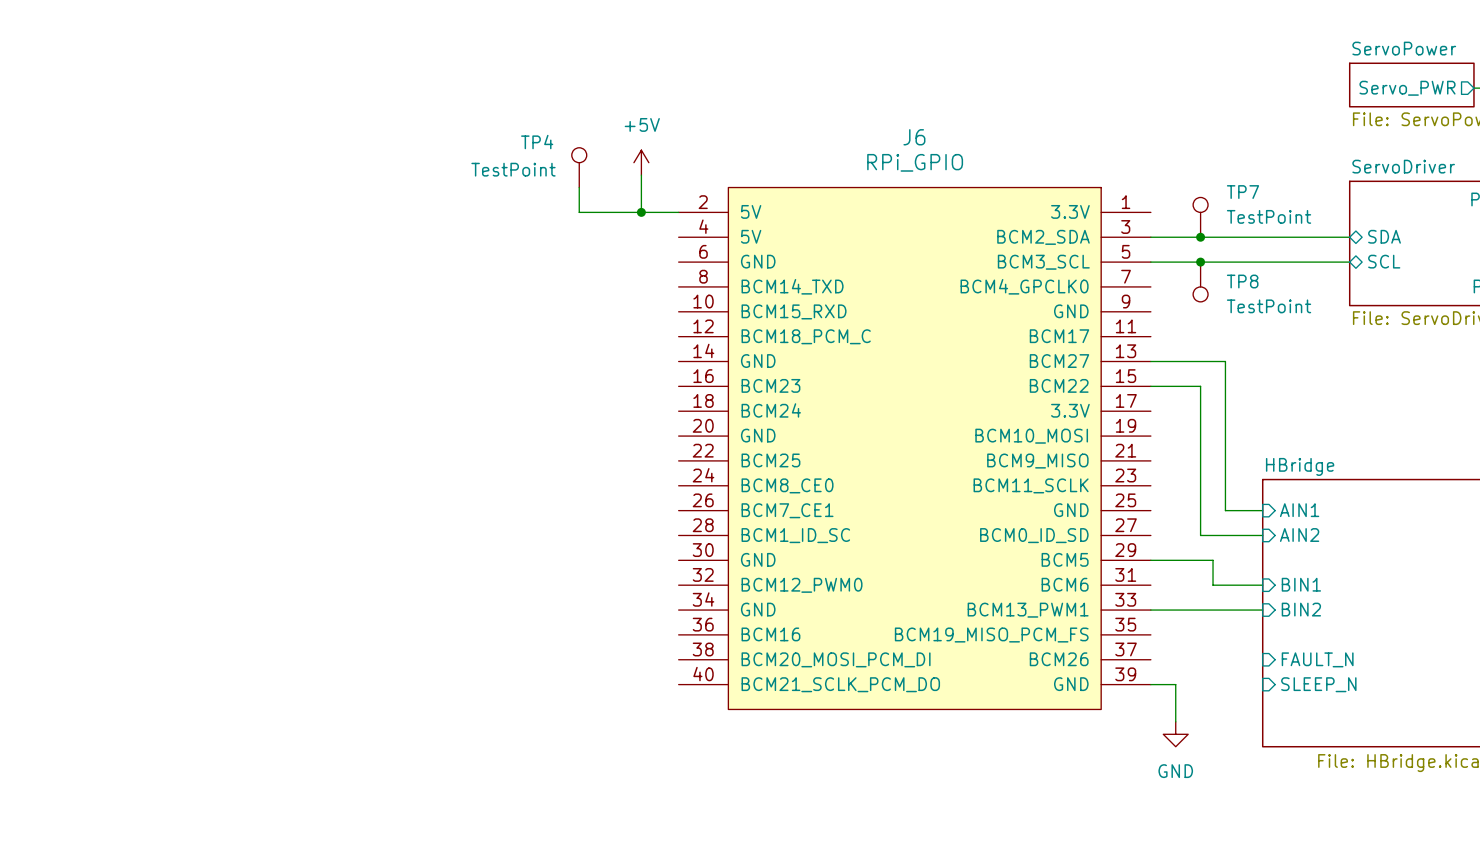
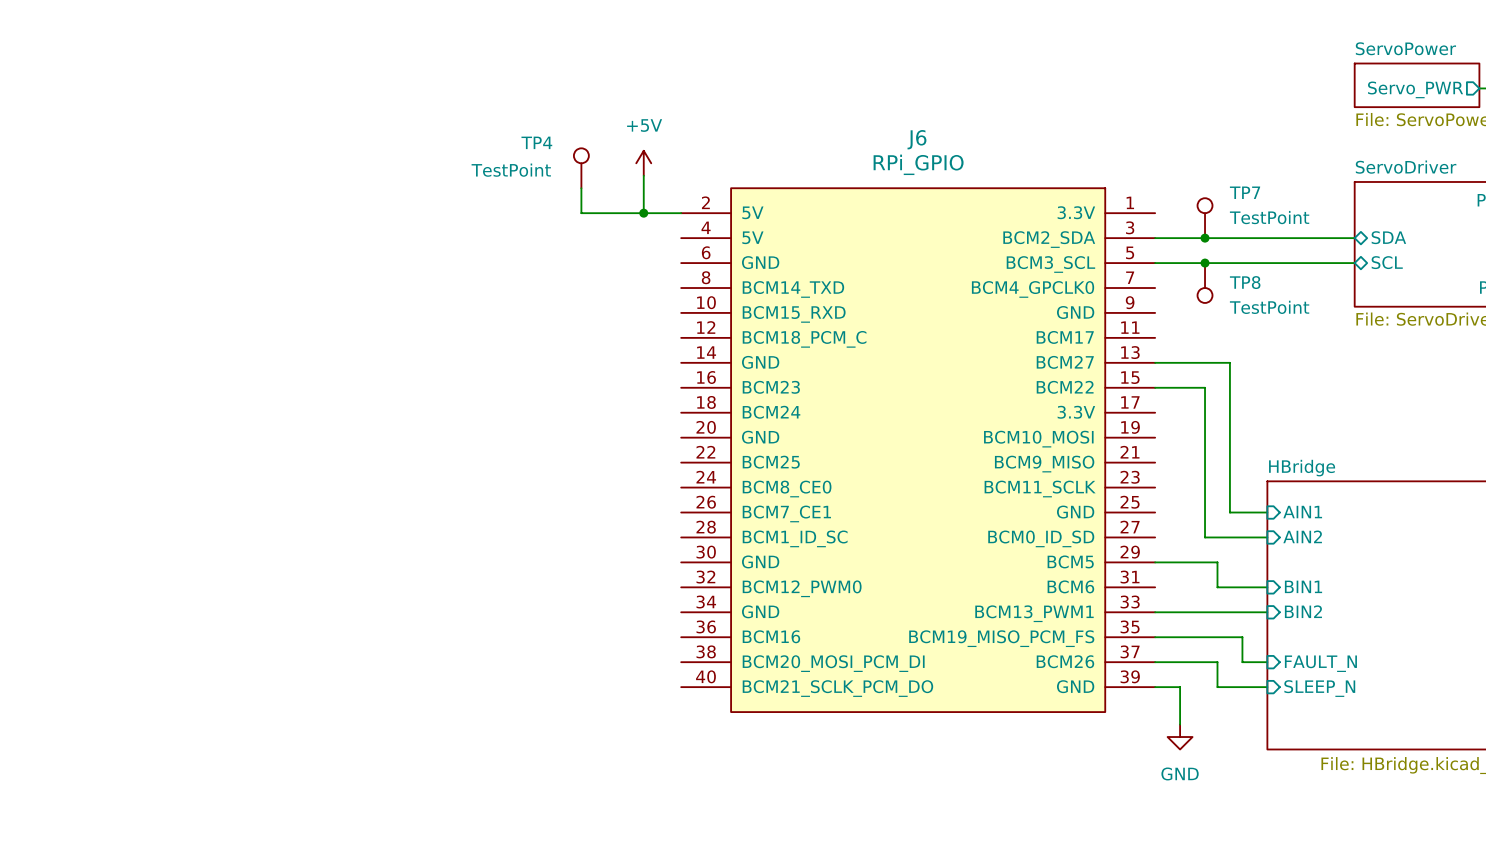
wire: none -> (1155, 637) (1242, 637) (1242, 662) (1267, 662)
wire: none -> (1155, 662) (1217, 662) (1217, 687) (1267, 687)

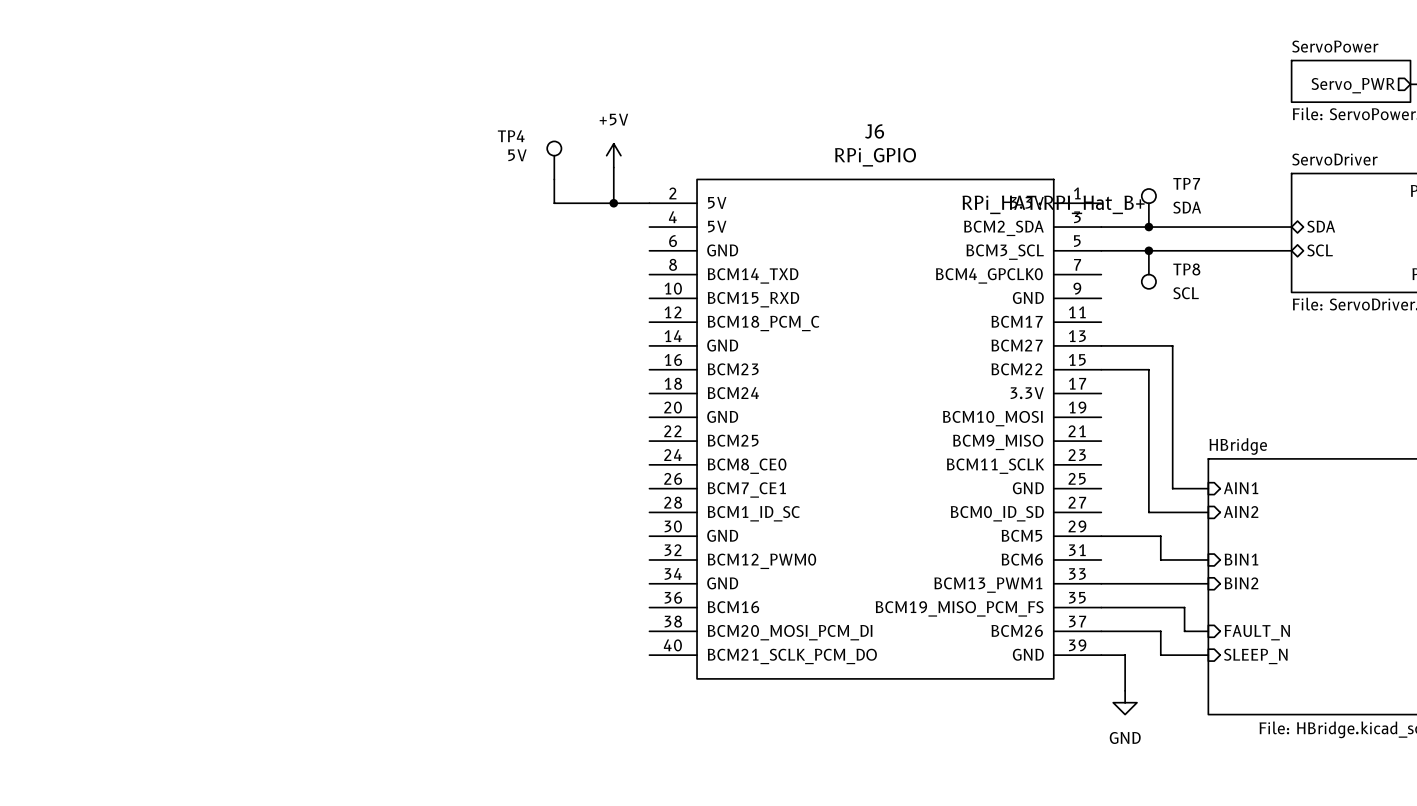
TP4 value: TestPoint (511, 170) -> 5V (517, 155)
J6 text: none -> RPi_HAT:RPI_Hat_B+ (1053, 204)
TP7 value: TestPoint (1269, 217) -> SDA (1187, 207)
TP8 value: TestPoint (1269, 307) -> SCL (1186, 293)

